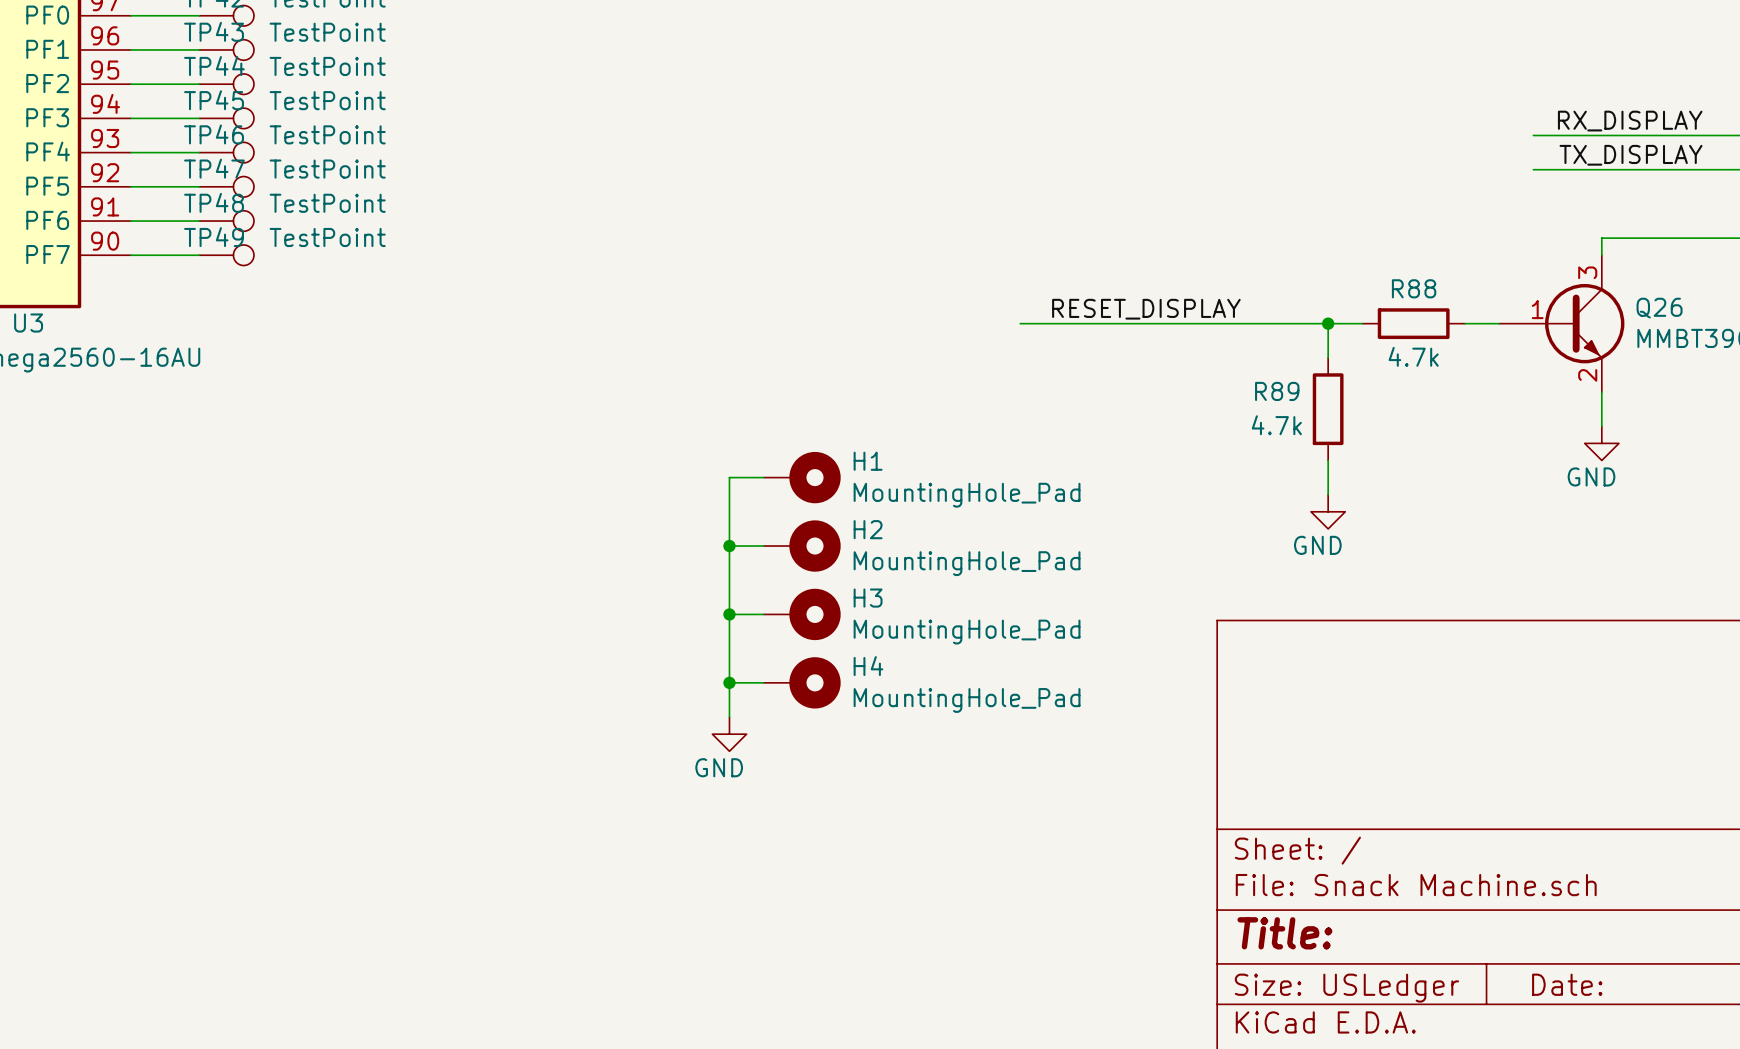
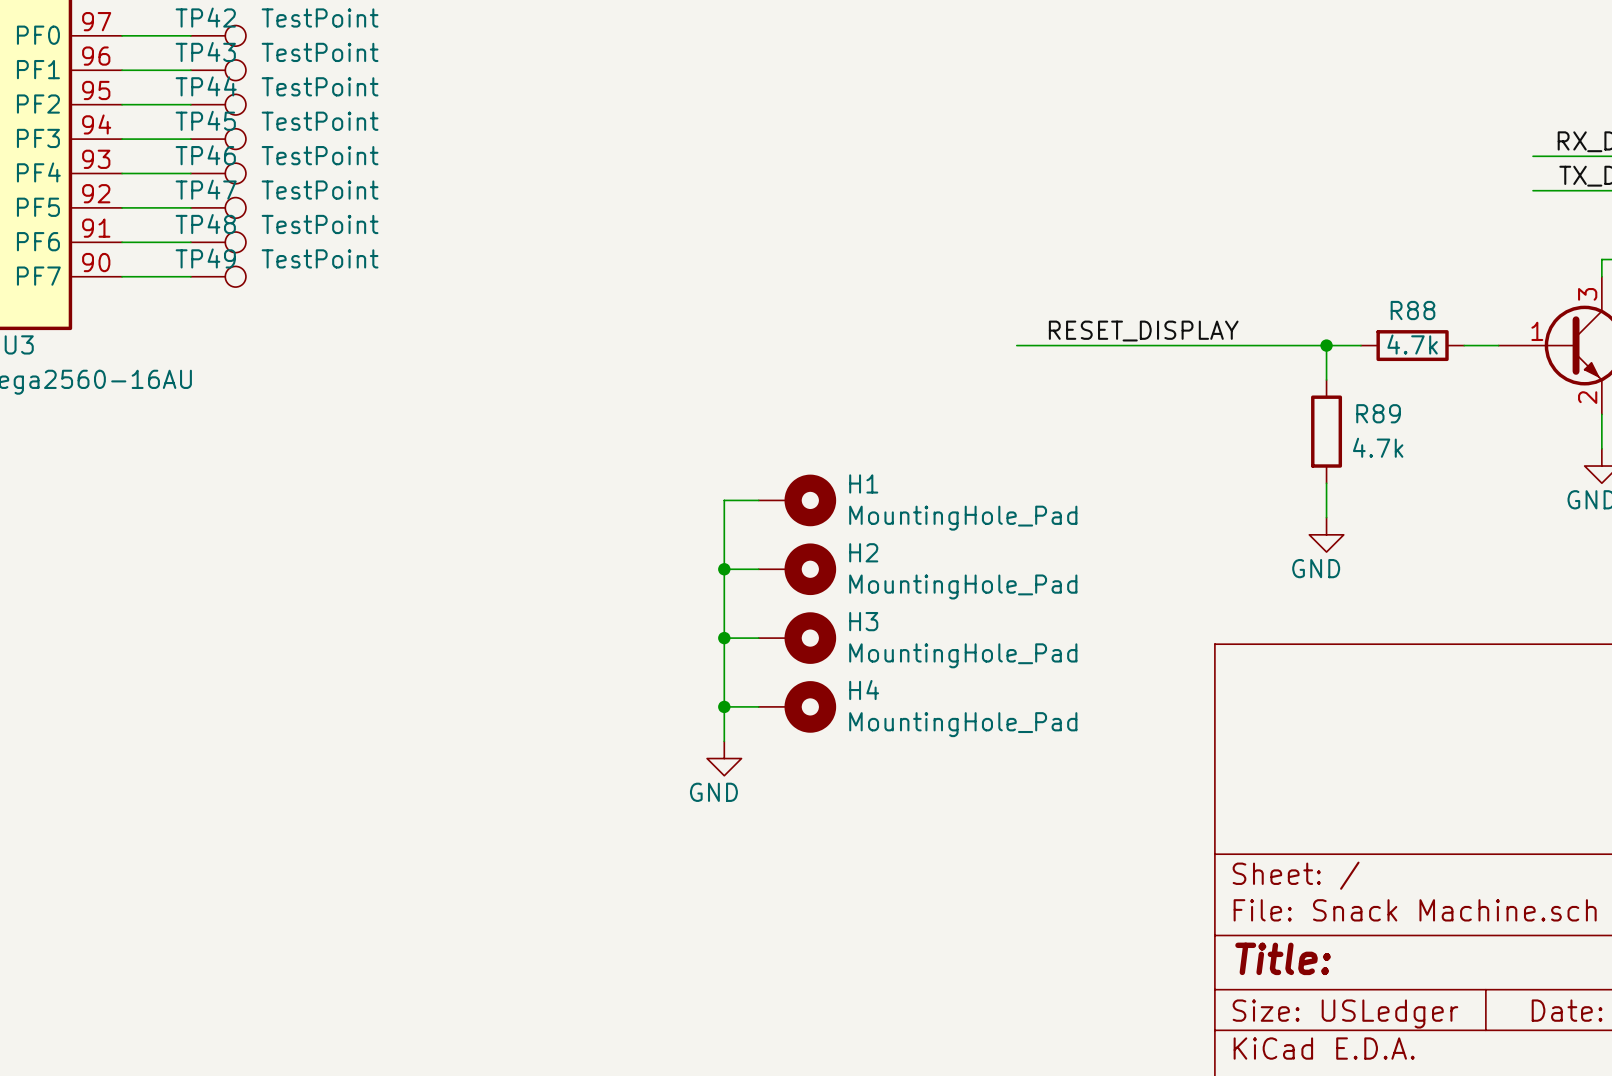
R88 value position: 4.7k (1413, 356) -> 4.7k (1412, 344)
R89 name position: R89 (1277, 391) -> R89 (1378, 413)
R89 value position: 4.7k (1276, 425) -> 4.7k (1378, 447)

